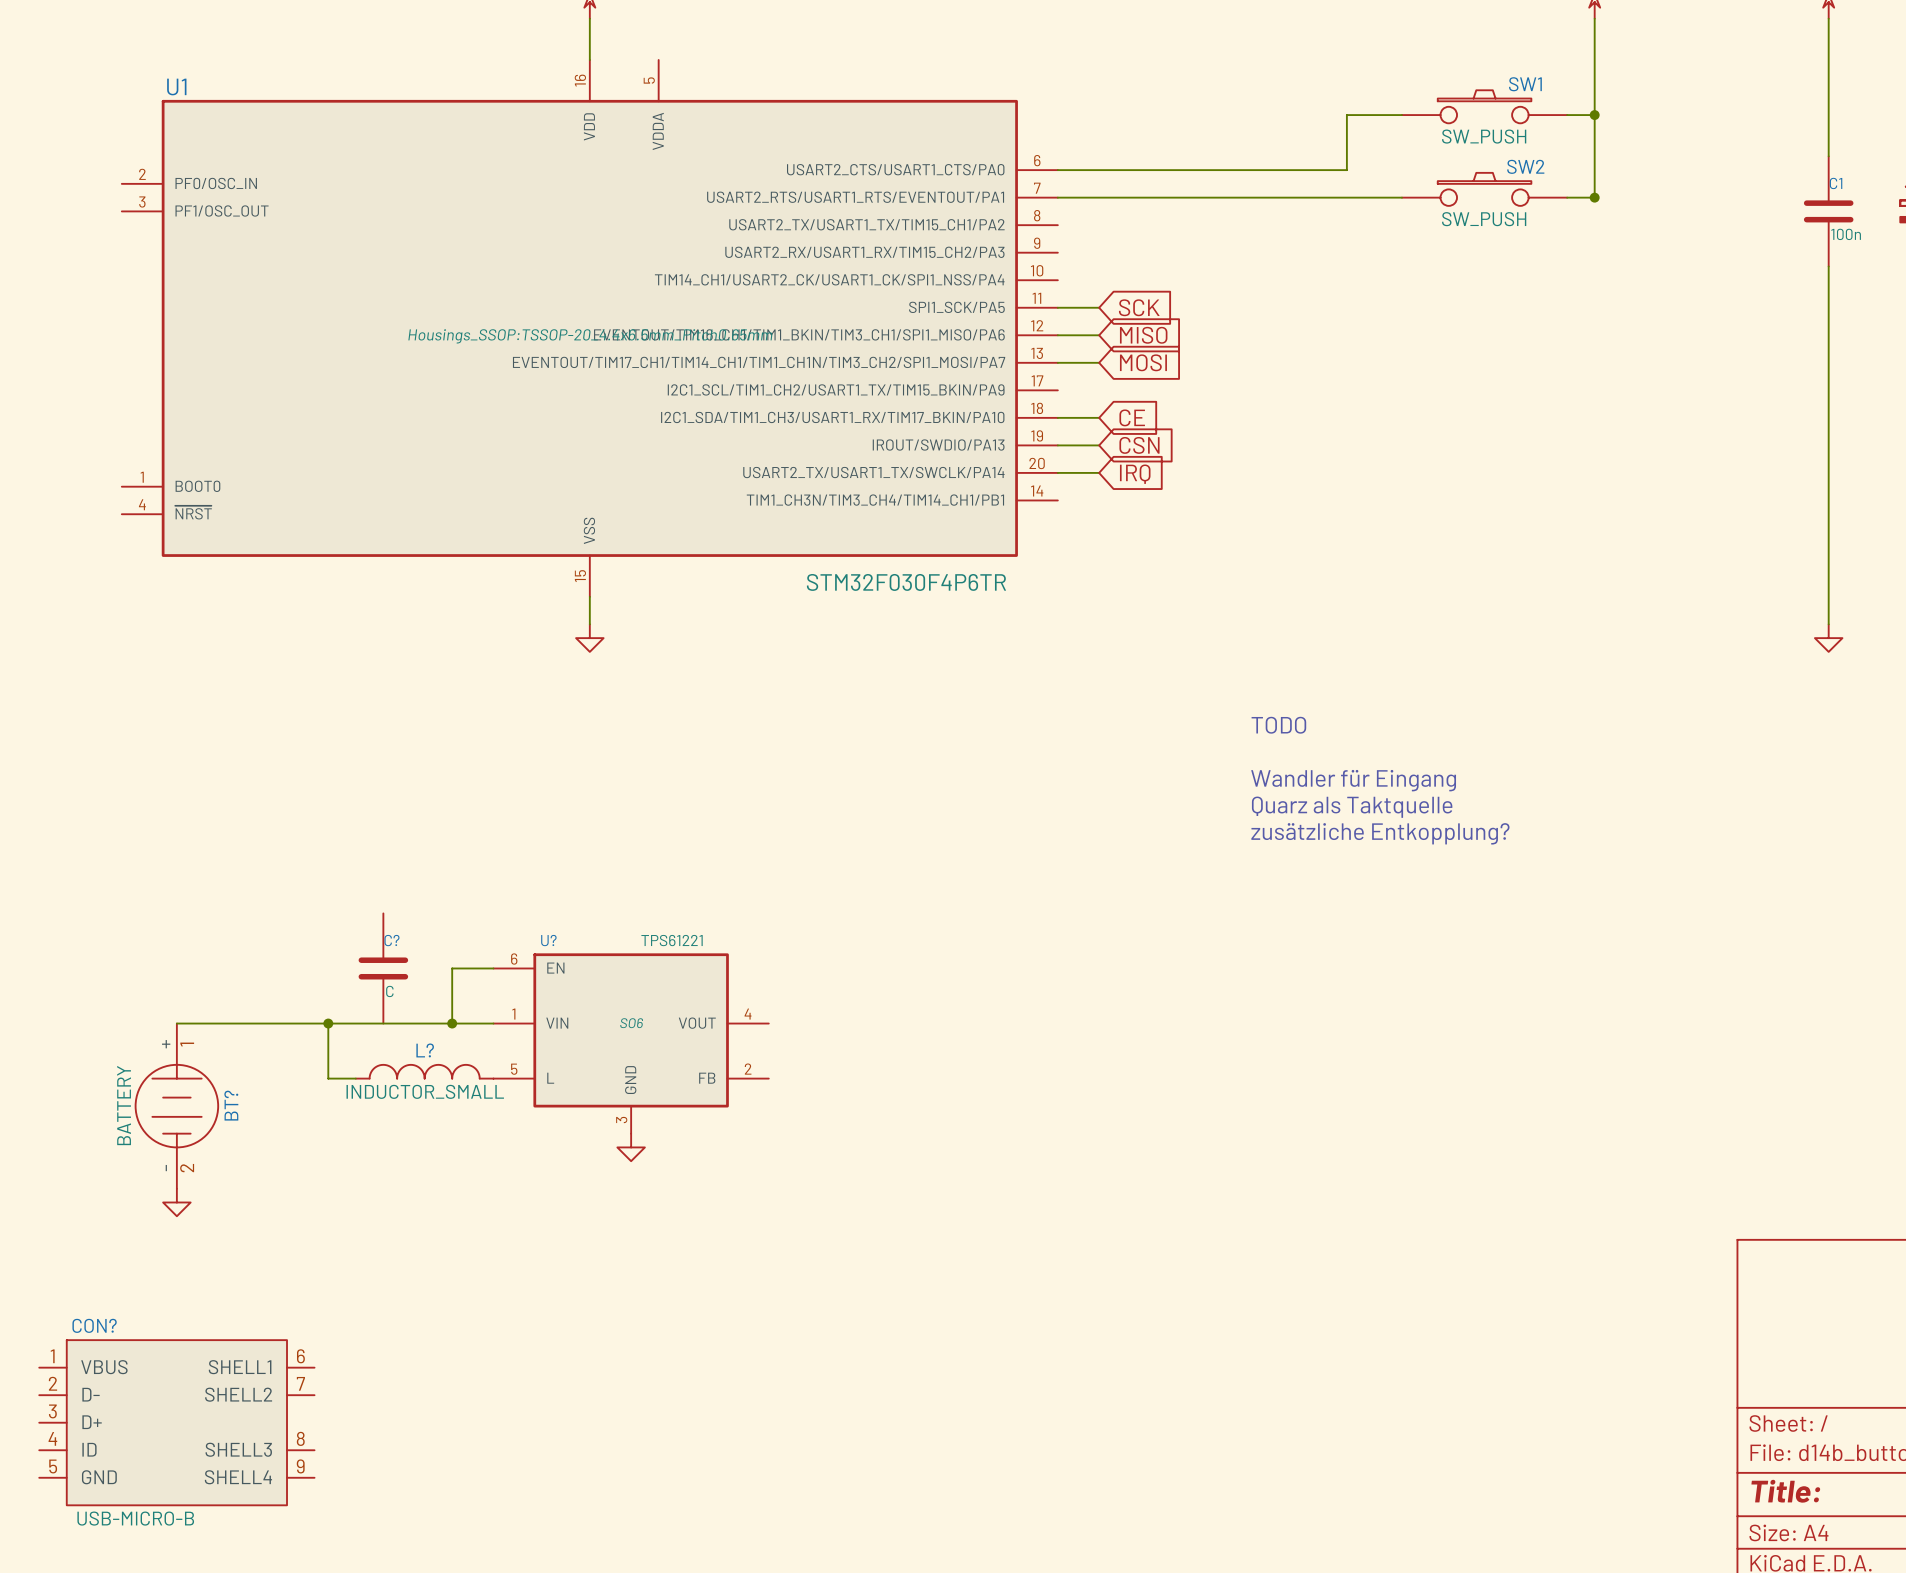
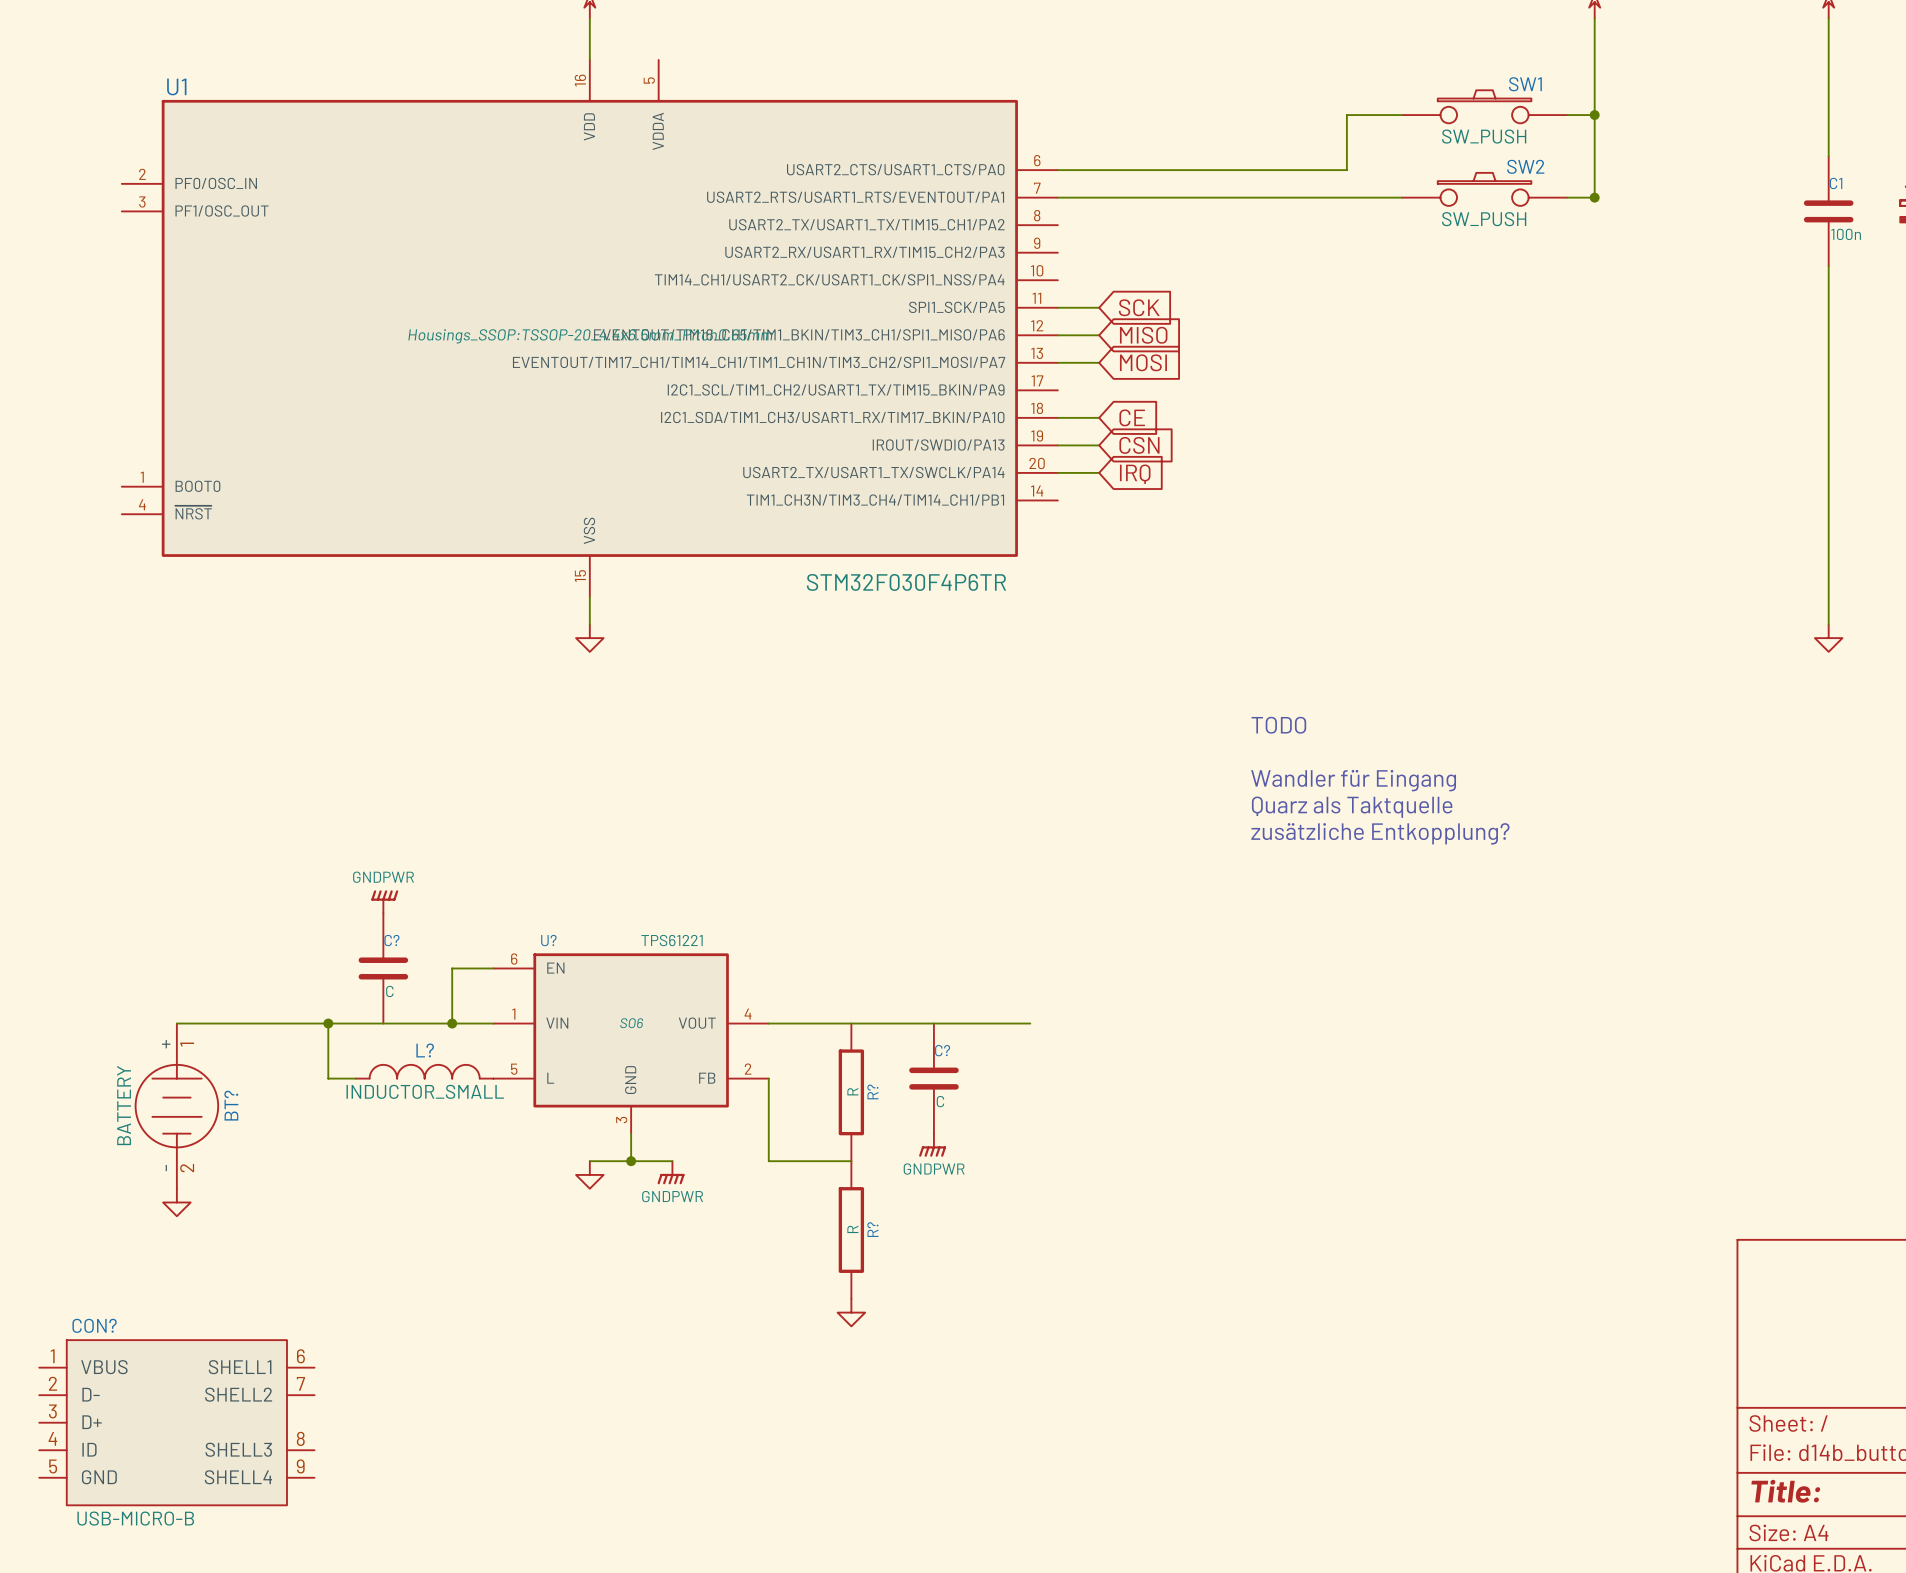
power symbol: none -> GNDPWR (384, 901)
wire: none -> (768, 1023) (1030, 1023)
wire: none -> (768, 1078) (768, 1161) (851, 1161)
C?: none -> C (933, 1078)
R?: none -> R (851, 1092)
power symbol: none -> GNDPWR (932, 1145)
power symbol position: (631, 1147) -> (589, 1174)
wire: none -> (589, 1161) (672, 1161)
junction: none -> (631, 1161)
power symbol: none -> GNDPWR (671, 1172)
R?: none -> R (851, 1230)
power symbol: none -> (851, 1312)

